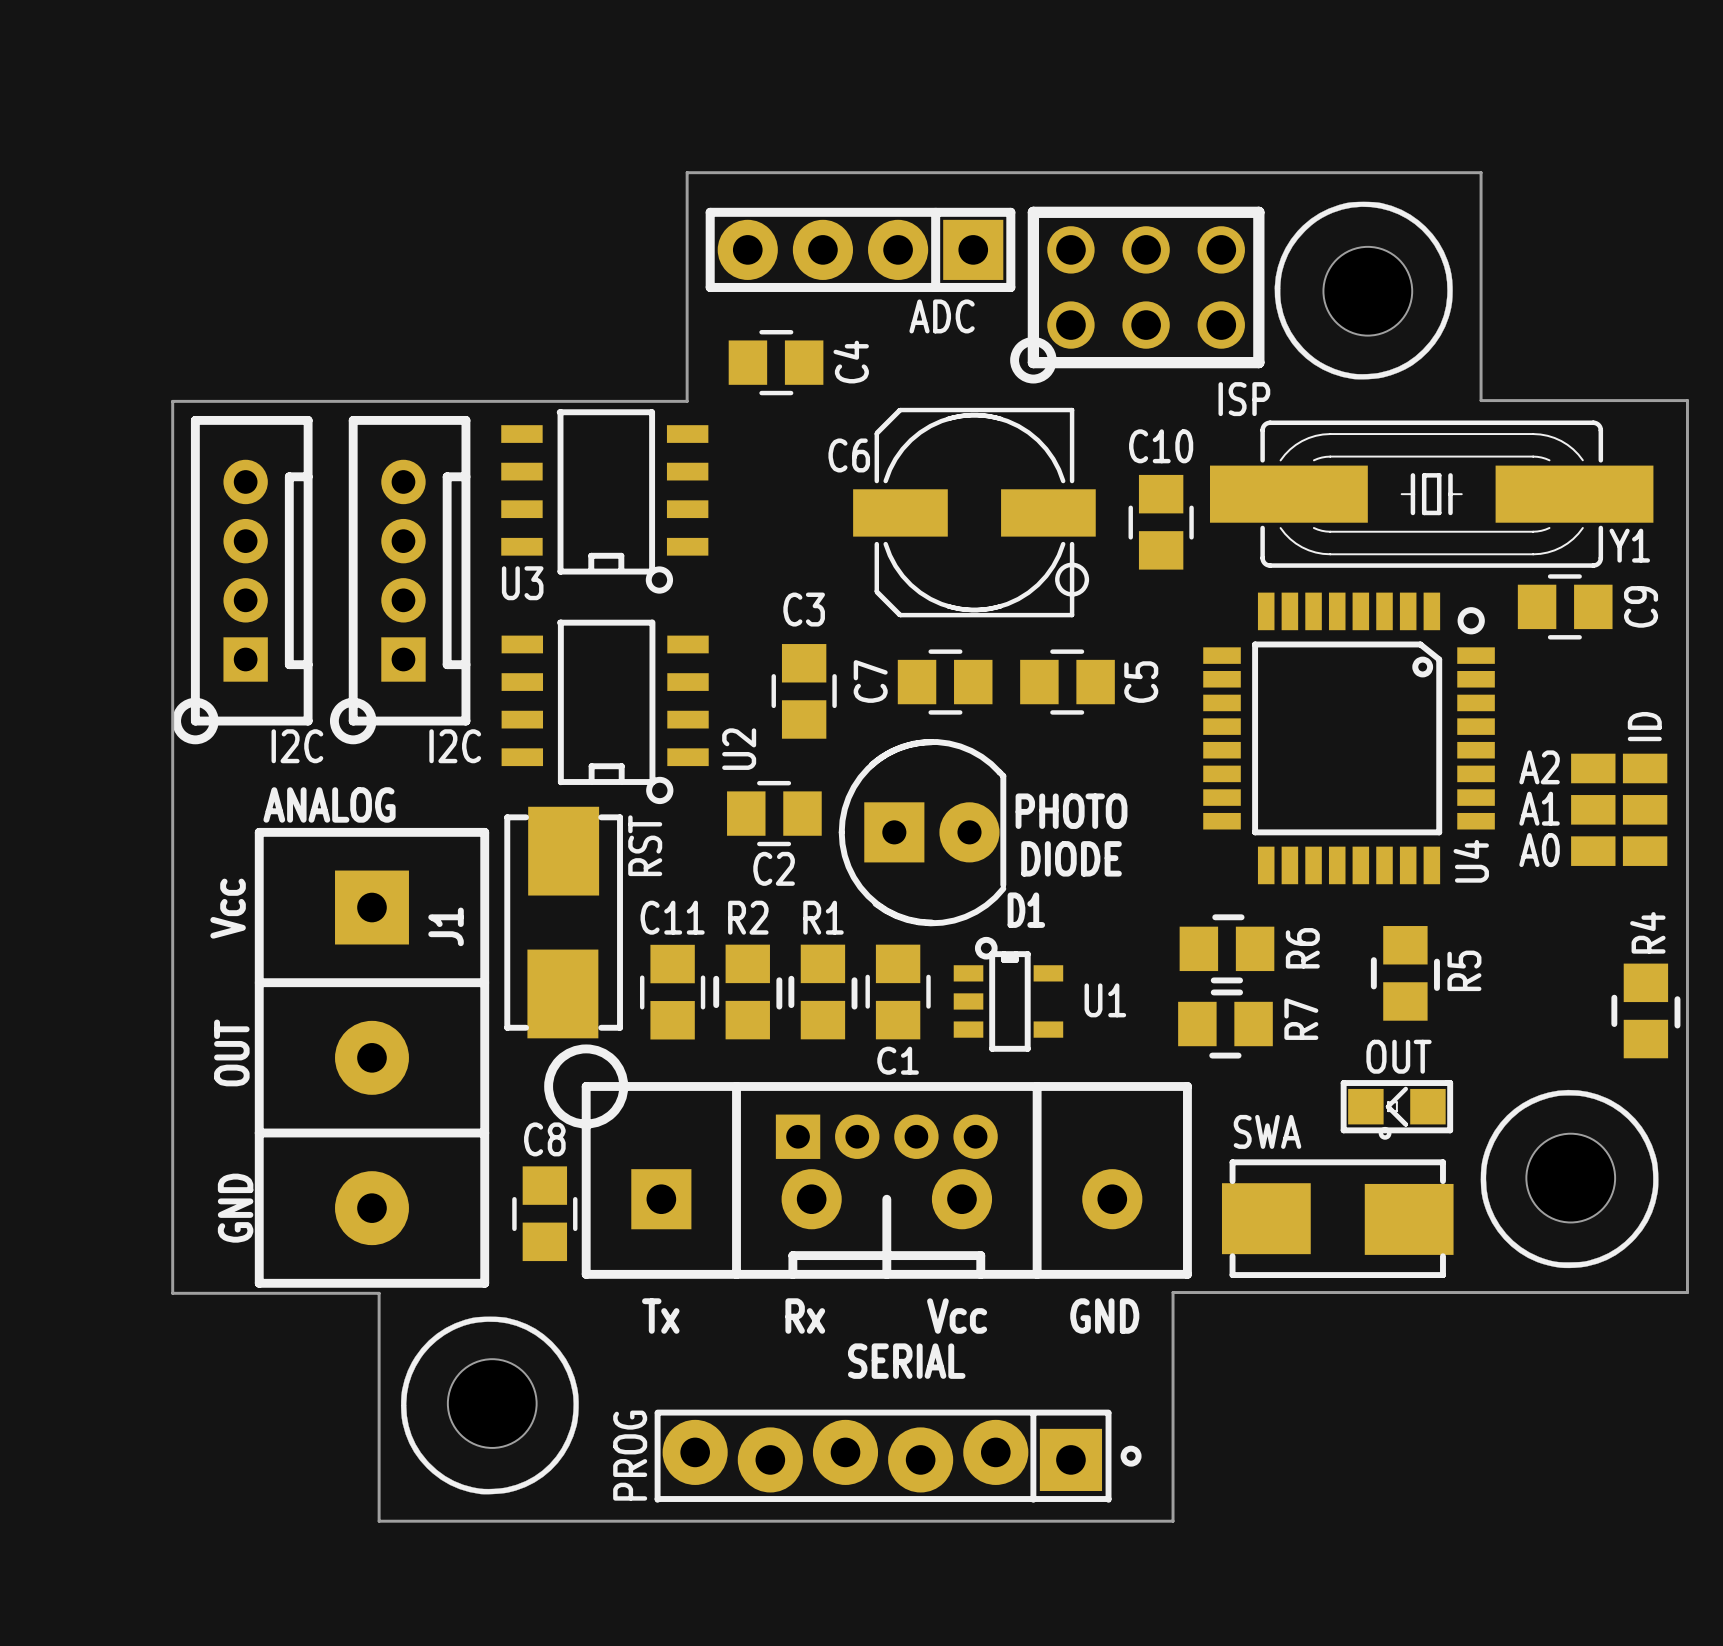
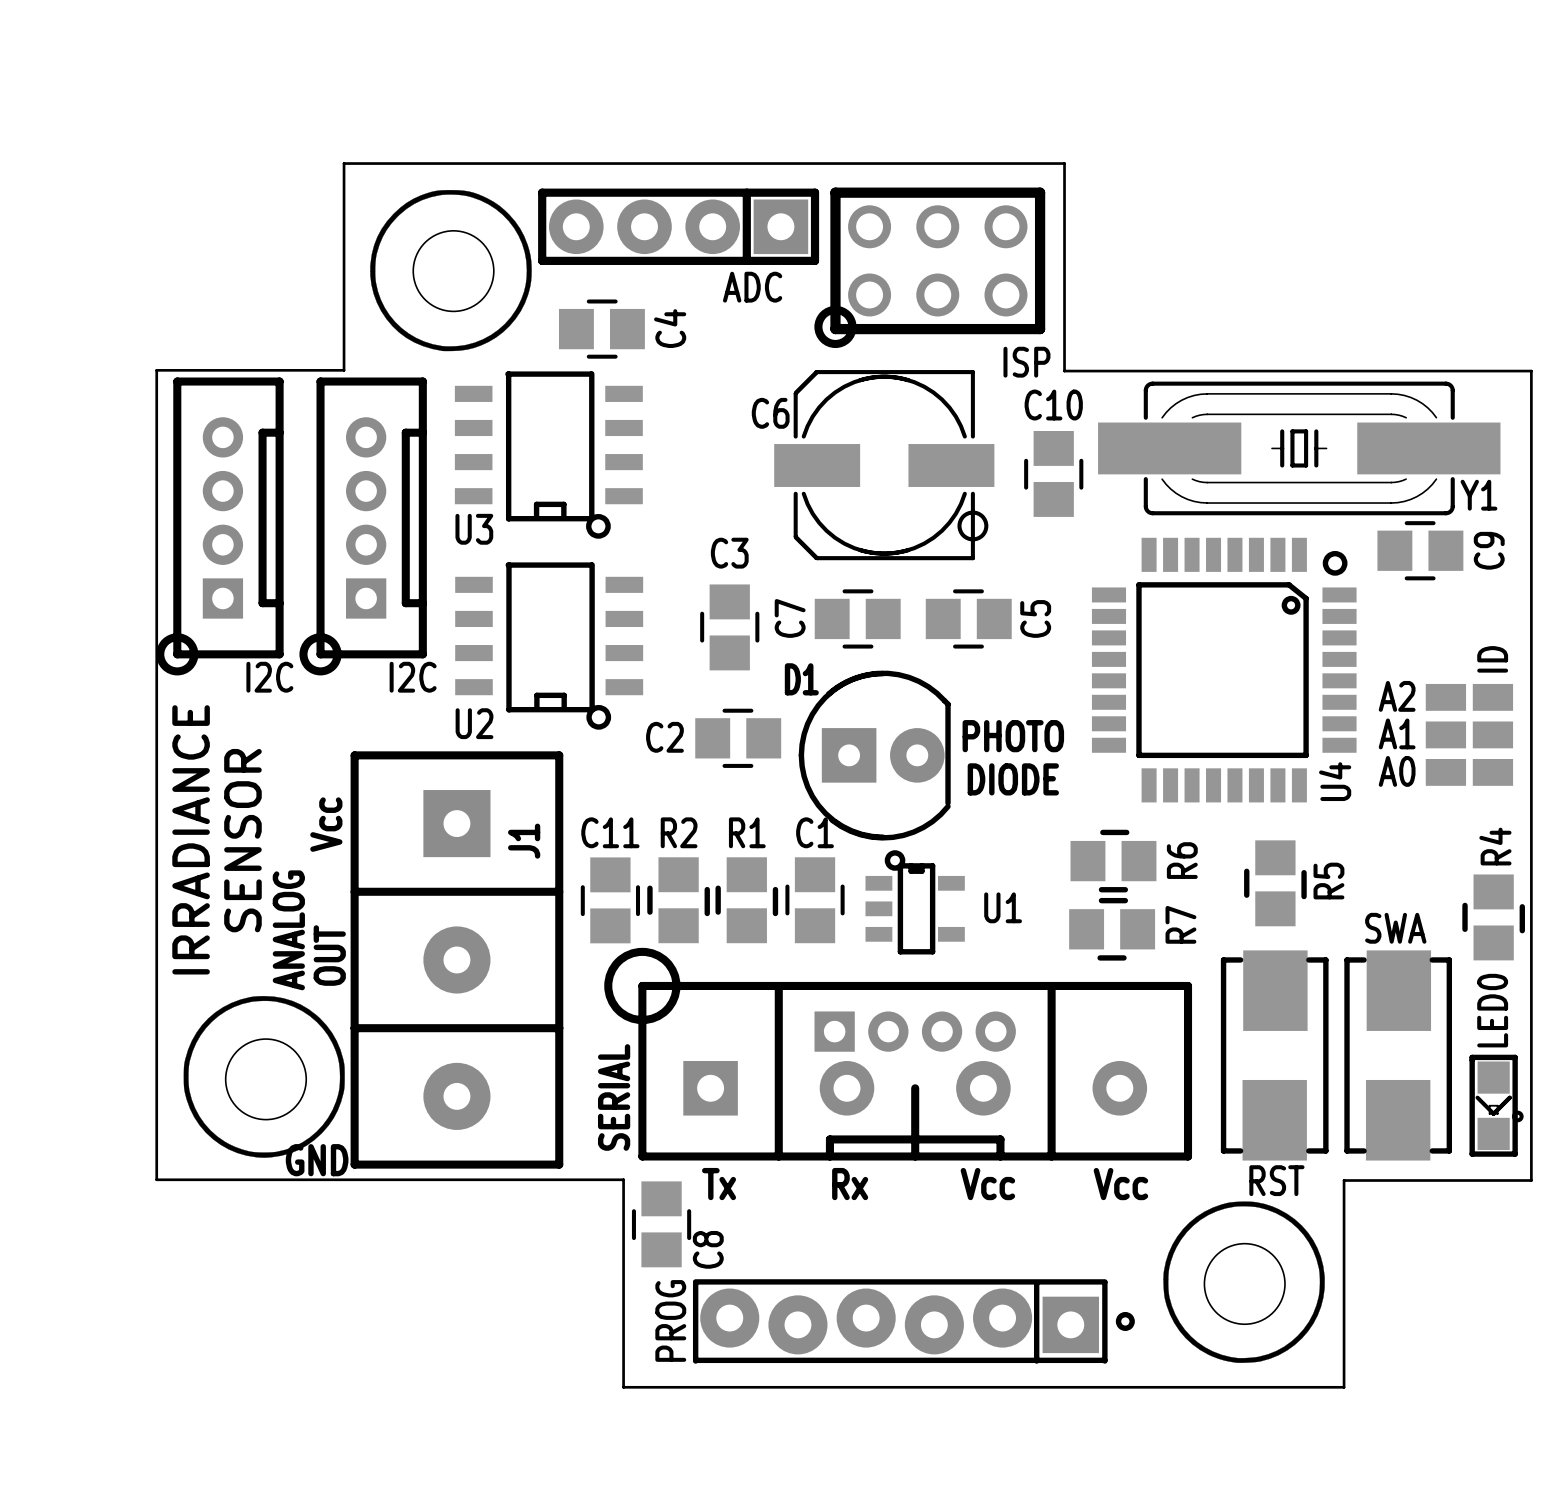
part footprint: [171, 171, 1689, 1523] -> [155, 162, 1533, 1389]
part position: (860, 249) -> (678, 226)
part position: (1137, 295) -> (929, 267)
C4 position: (776, 362) -> (601, 329)
U2 name rotation: 0° (739, 749) -> 90° clockwise (474, 723)
U2 name position: U2 (739, 749) -> U2 (474, 723)
J1 value rotation: 0° (329, 804) -> 90° counterclockwise (288, 930)
J1 value position: ANALOG (329, 804) -> ANALOG (288, 930)
text position: PHOTO (1071, 811) -> PHOTO (1013, 736)
C2 position: (774, 813) -> (738, 738)
part: (922, 832) -> none
part: none -> (874, 755)
text position: DIODE (1071, 858) -> DIODE (1013, 779)
C2 name position: C2 (774, 868) -> C2 (664, 737)
part: RST (563, 922) -> none
text: none -> IRRADIANCE (191, 839)
text: none -> SENSOR (242, 840)
J1 position: (371, 1057) -> (456, 959)
C1 name position: C1 (898, 1060) -> C1 (815, 832)
part: OUT (1396, 1109) -> none
part value position: SWA (1267, 1131) -> SWA (1395, 928)
C8 name rotation: 0° (544, 1139) -> 90° counterclockwise (708, 1249)
C8 name position: C8 (544, 1139) -> C8 (708, 1249)
part position: (868, 1161) -> (898, 1054)
part: none -> RST (1274, 1055)
J1 text rotation: 0° (235, 1208) -> 90° clockwise (317, 1160)
C8 position: (544, 1213) -> (661, 1224)
part rotation: 0° (1337, 1218) -> 90° clockwise (1398, 1055)
part position: (1337, 1218) -> (1398, 1055)
part: none -> LED0 (1496, 1105)
text: none -> Vcc (1120, 1184)
text position: Tx (660, 1316) -> Tx (719, 1184)
text position: Rx (805, 1316) -> Rx (850, 1184)
text position: Vcc (957, 1316) -> Vcc (987, 1184)
text: GND (1104, 1316) -> none
part value rotation: 0° (906, 1361) -> 90° counterclockwise (614, 1097)
part value position: SERIAL (906, 1361) -> SERIAL (614, 1097)
part position: (898, 1456) -> (913, 1321)

